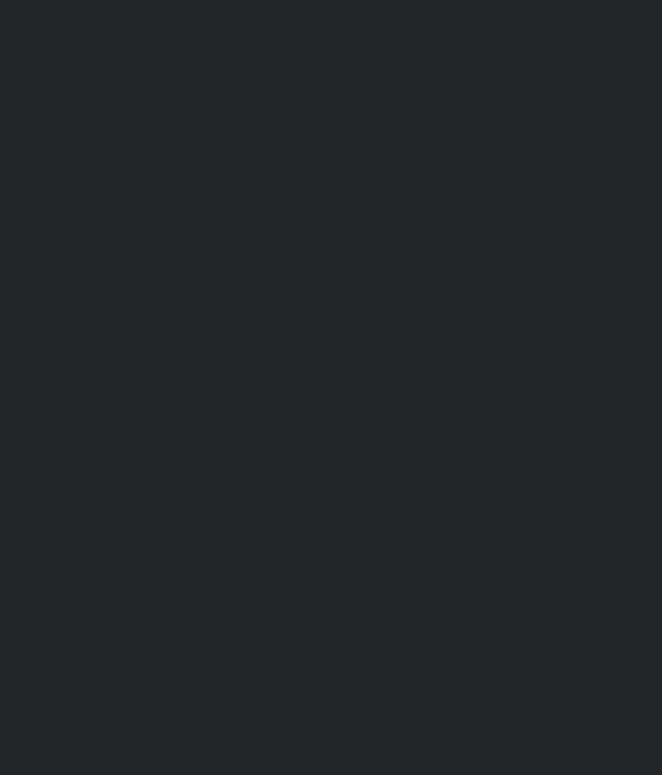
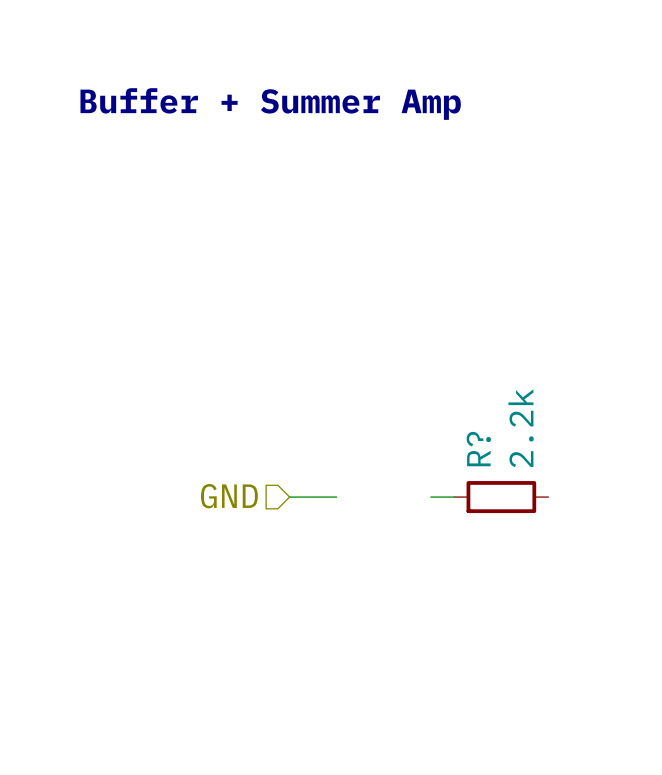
text: none -> Buffer + Summer Amp (270, 104)
hierarchical label: none -> GND (229, 496)
wire: none -> (289, 497) (336, 497)
wire: none -> (430, 497) (454, 497)
R?: none -> 2.2k (501, 497)

